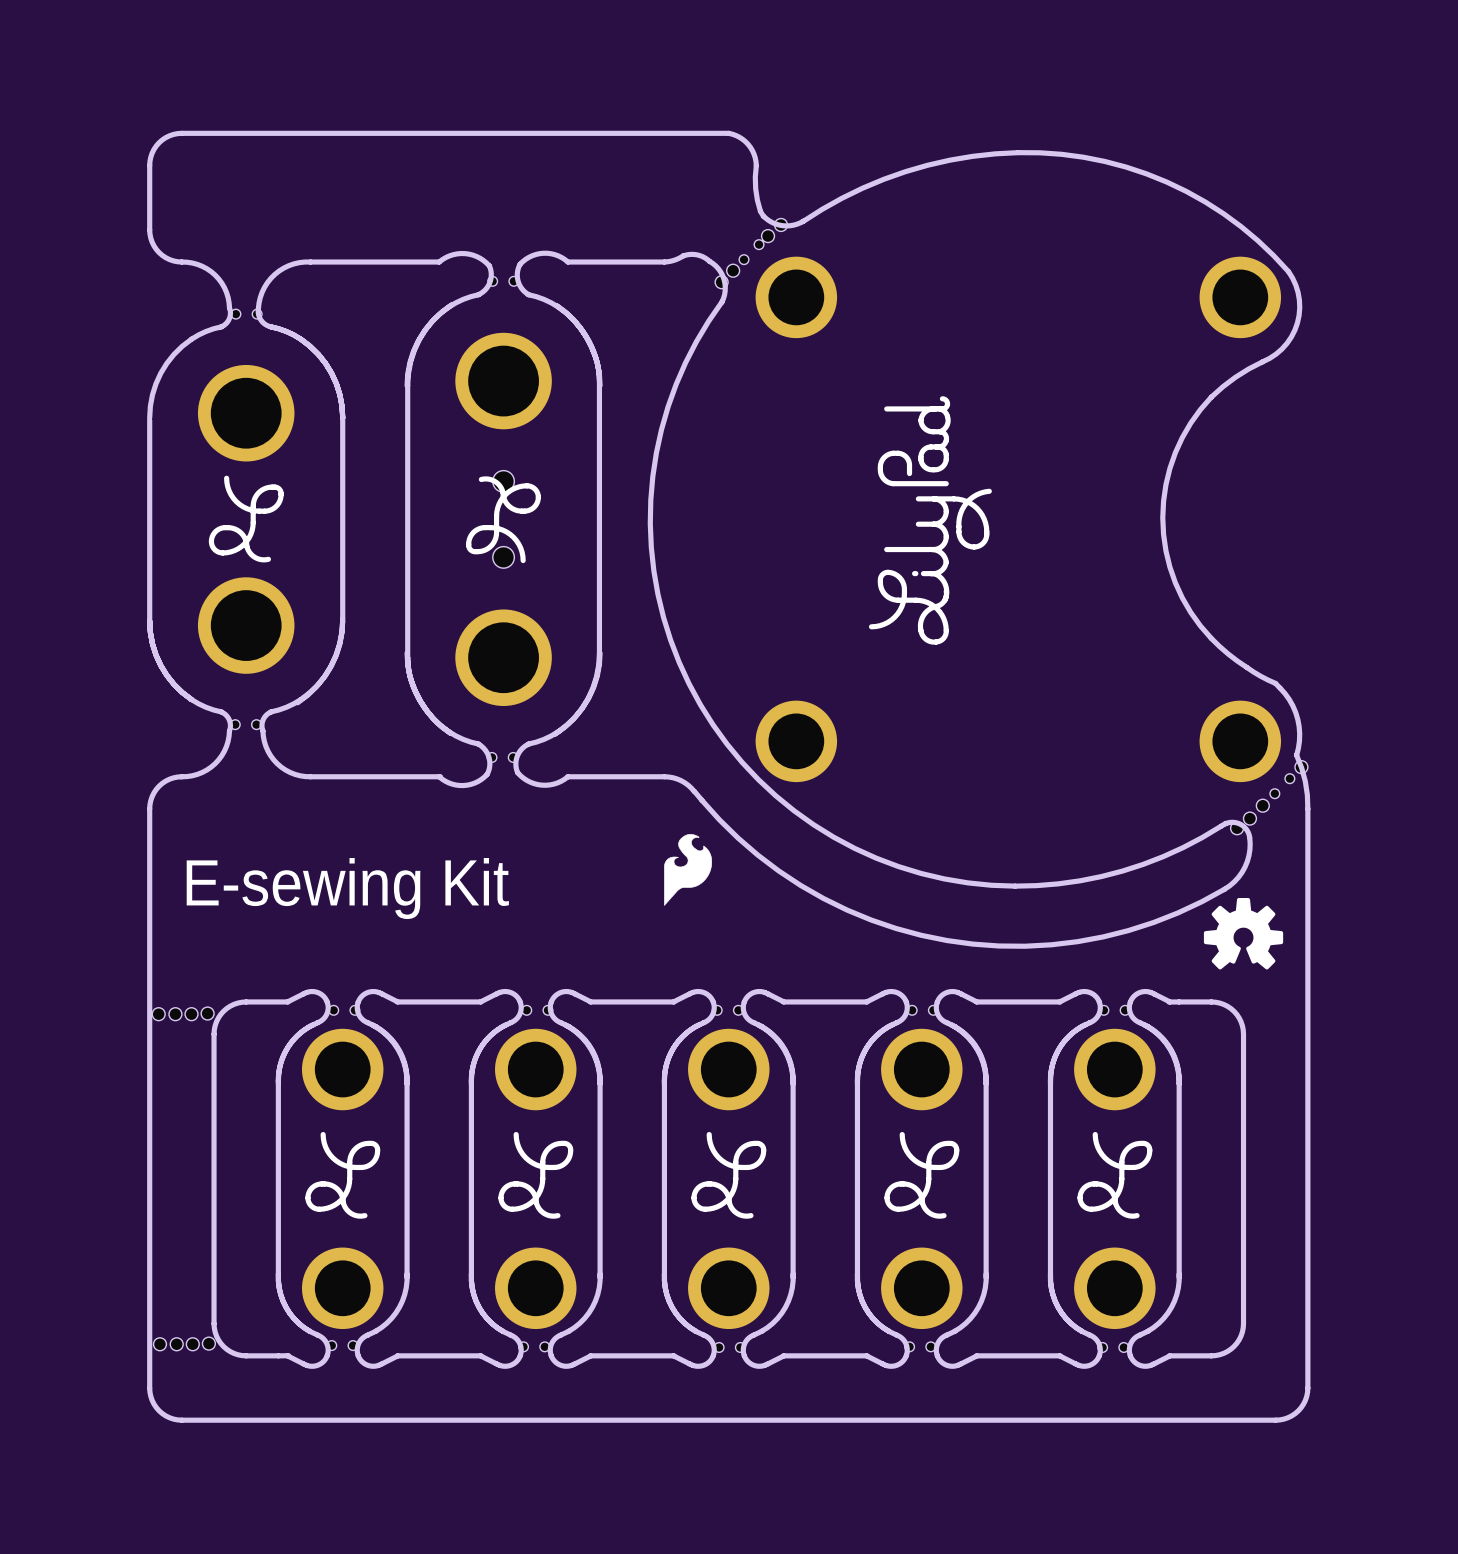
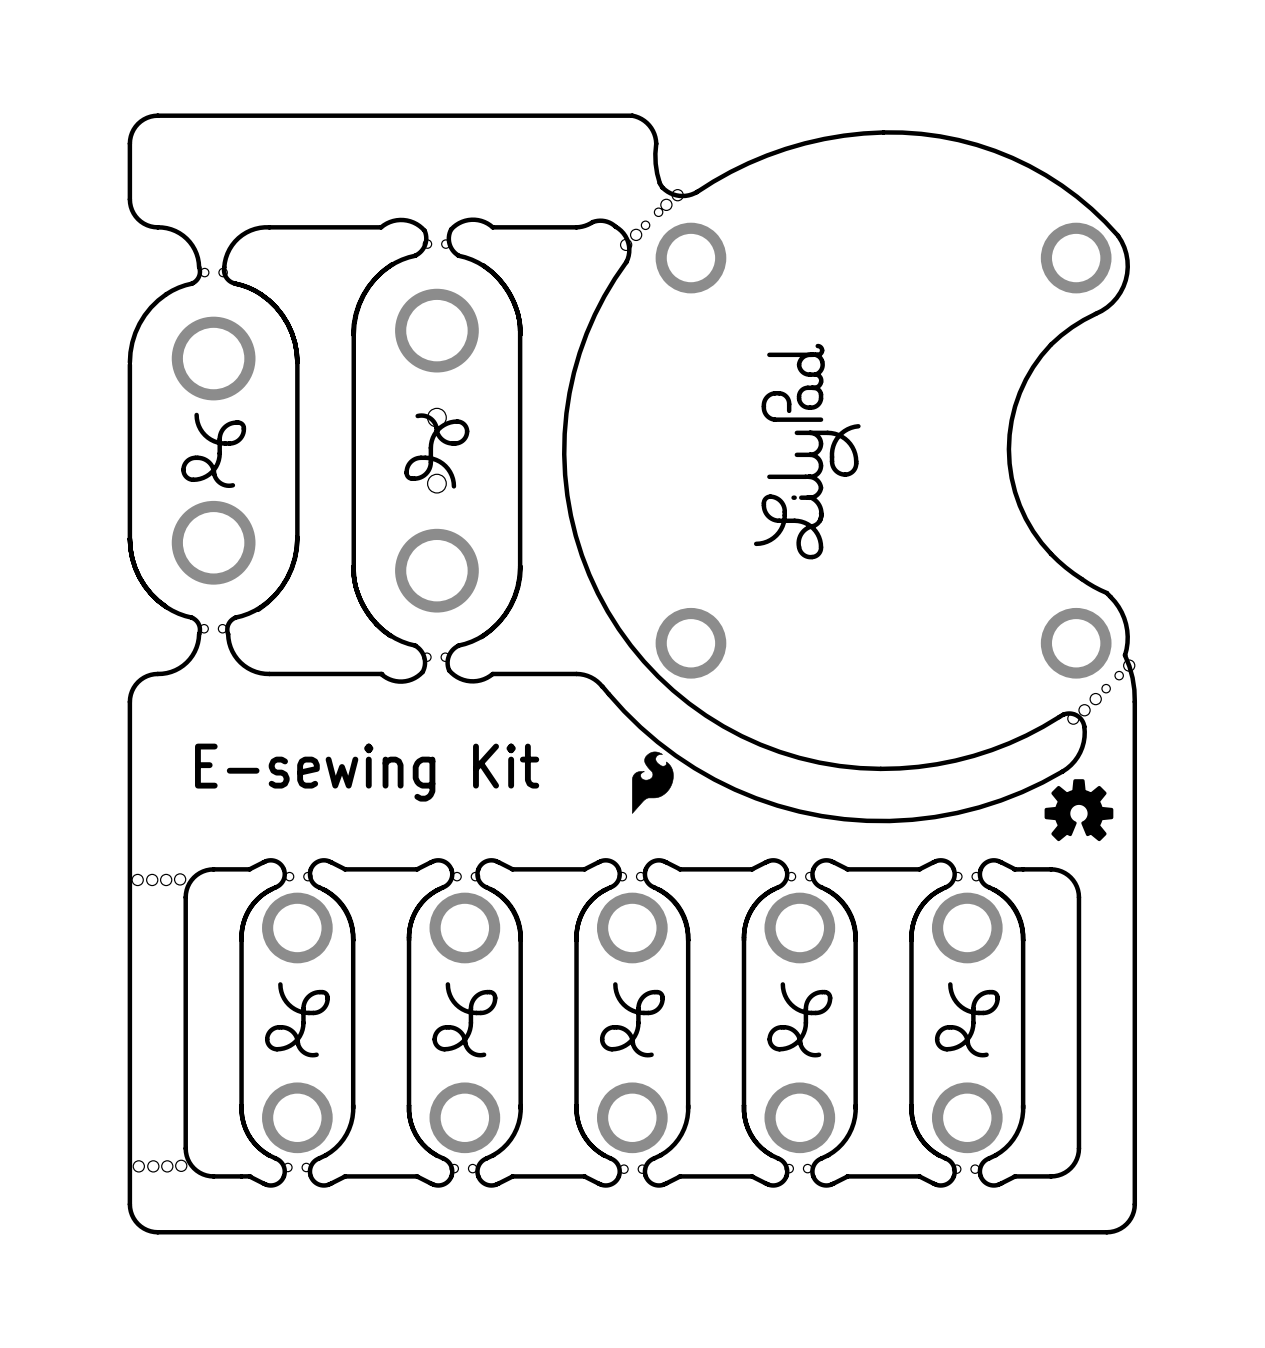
drawing position: (688, 869) -> (652, 782)
text position: E-sewing Kit (347, 888) -> E-sewing Kit (367, 772)

